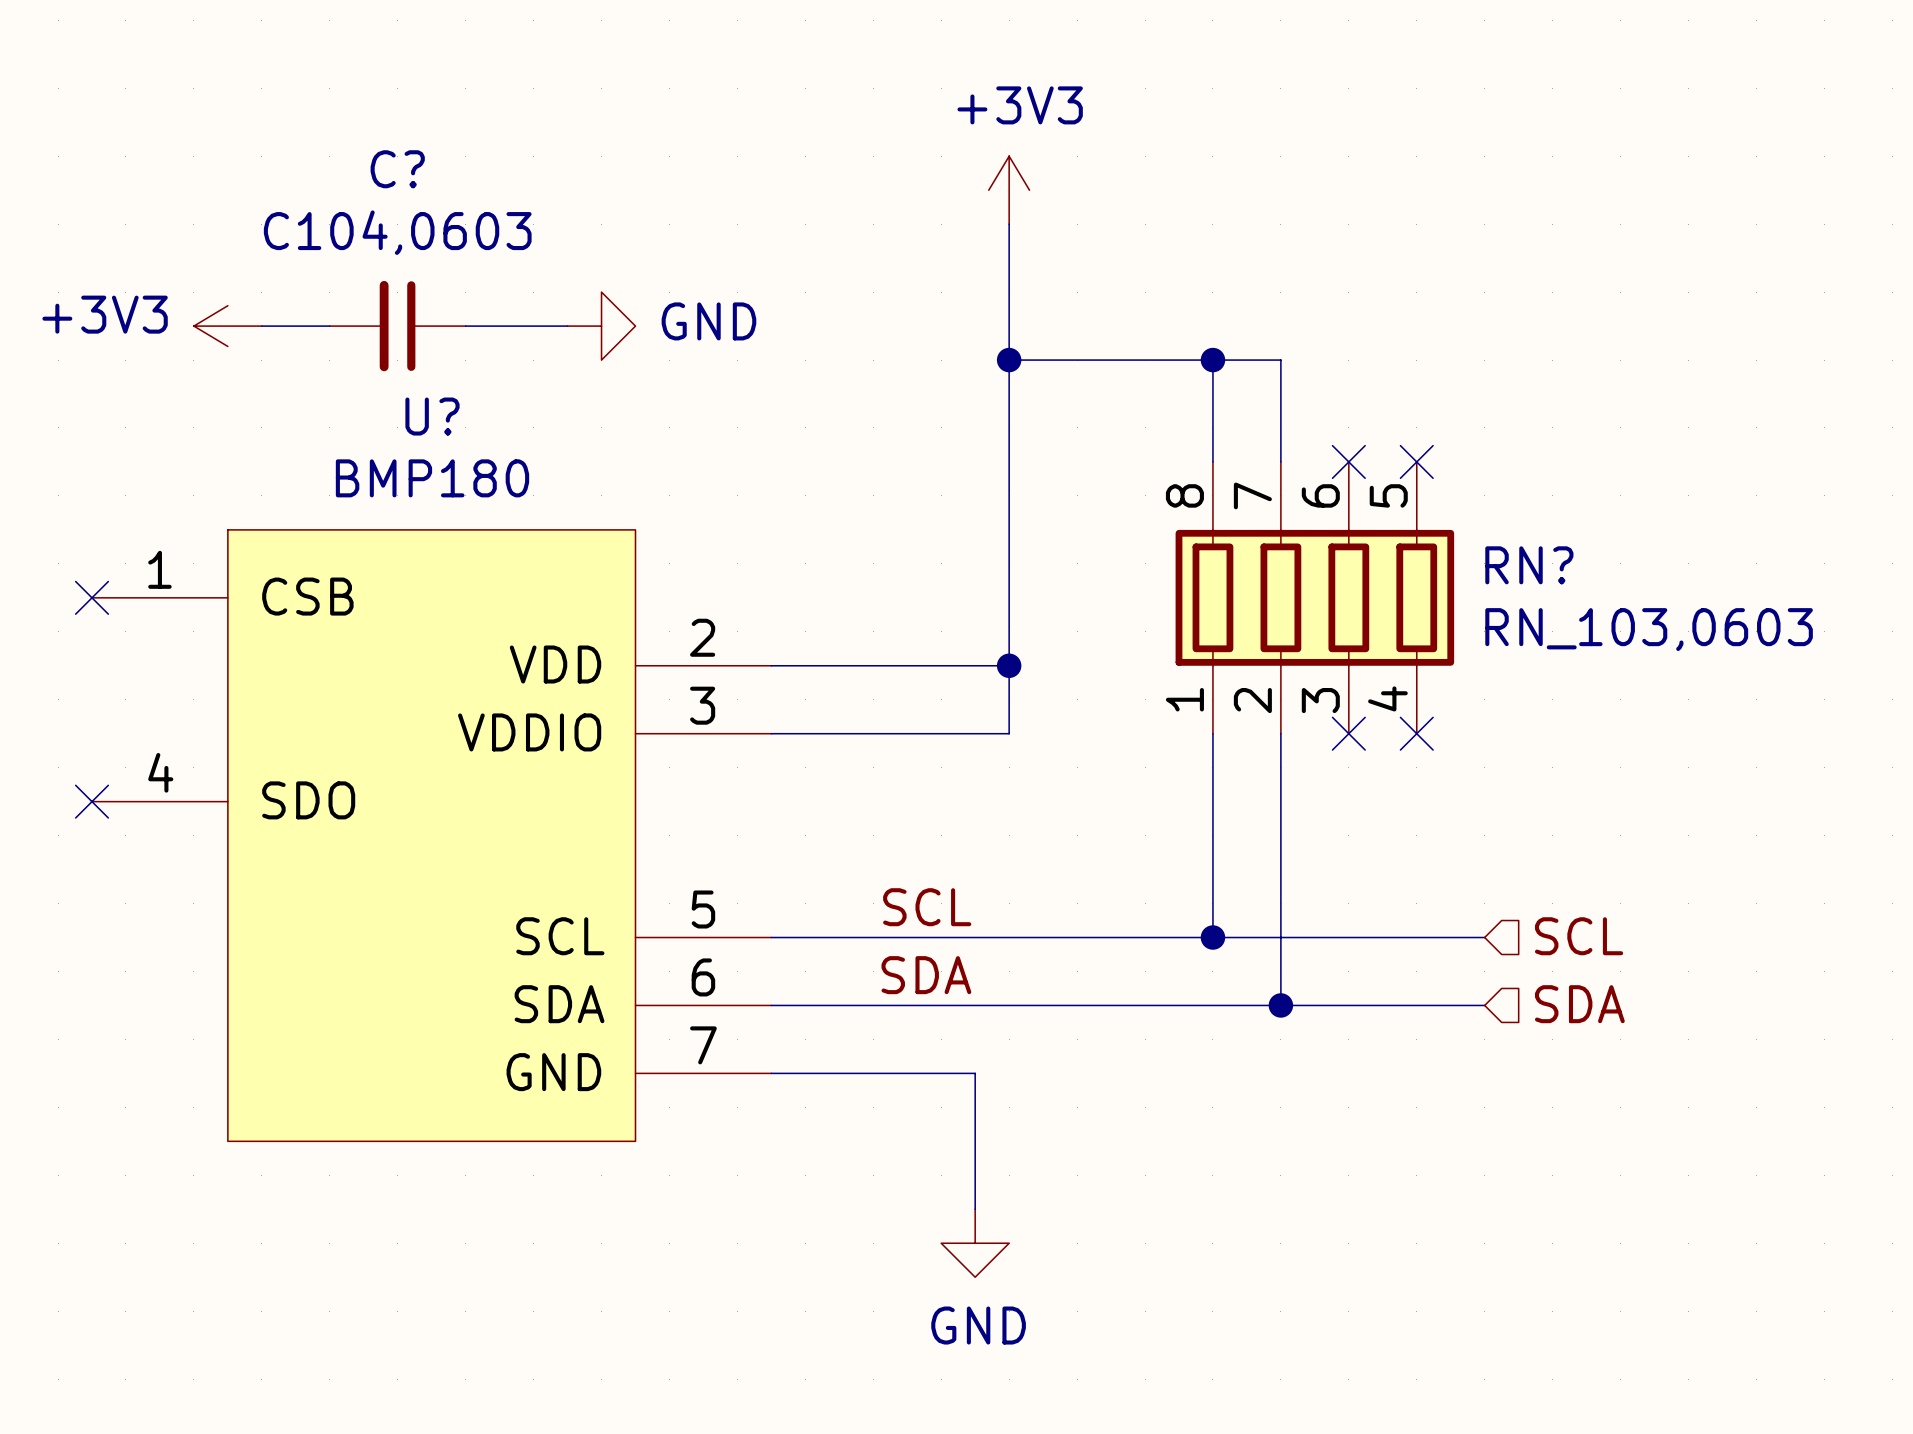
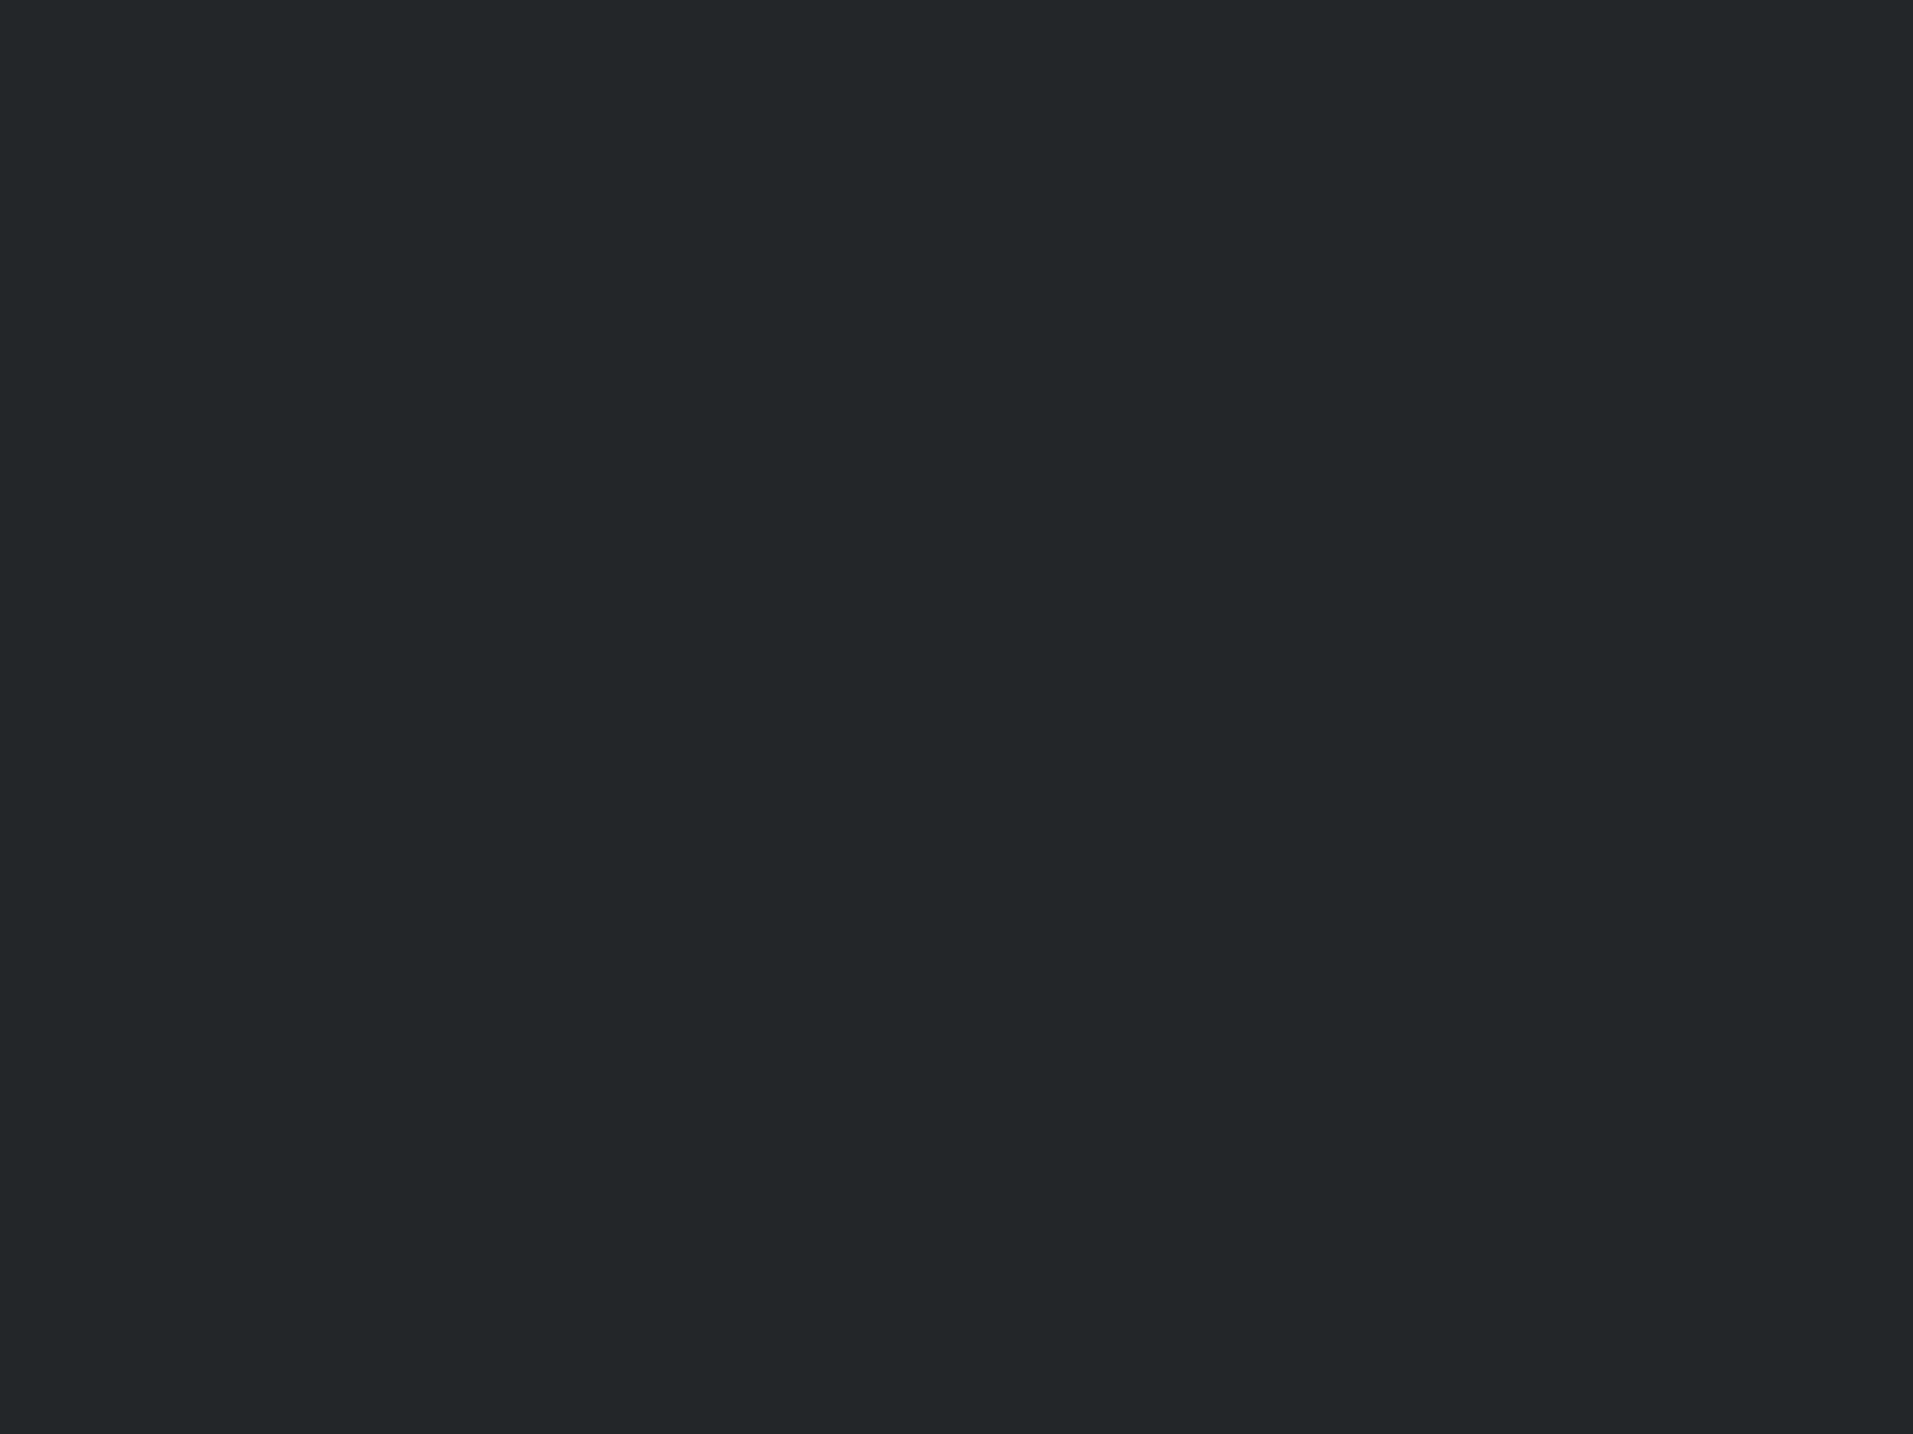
power symbol: +3V3 (1009, 190) -> none
wire: (1009, 224) (1009, 733) (771, 733) -> none
power symbol: +3V3 (227, 326) -> none
wire: (261, 326) (329, 326) -> none
C?: C104,0603 (397, 326) -> none
wire: (465, 326) (567, 326) -> none
power symbol: GND (601, 326) -> none
wire: (1009, 360) (1280, 360) (1280, 461) -> none
junction: (1009, 360) -> none
wire: (1212, 360) (1212, 461) -> none
junction: (1212, 360) -> none
no-connect mark: (1348, 461) -> none
no-connect mark: (1416, 461) -> none
no-connect mark: (92, 597) -> none
RN?: RN_103,0603 (1314, 597) -> none
wire: (771, 665) (1009, 665) -> none
junction: (1009, 665) -> none
wire: (1212, 733) (1212, 937) -> none
wire: (1280, 733) (1280, 1005) -> none
no-connect mark: (1348, 733) -> none
no-connect mark: (1416, 733) -> none
no-connect mark: (92, 801) -> none
U?: BMP180 (431, 835) -> none
label: SCL (927, 907) -> none
hierarchical label: SCL (1579, 936) -> none
wire: (771, 937) (1484, 937) -> none
junction: (1212, 937) -> none
label: SDA (926, 975) -> none
hierarchical label: SDA (1579, 1004) -> none
wire: (771, 1005) (1484, 1005) -> none
junction: (1280, 1005) -> none
wire: (771, 1073) (975, 1073) (975, 1209) -> none
power symbol: GND (975, 1243) -> none

